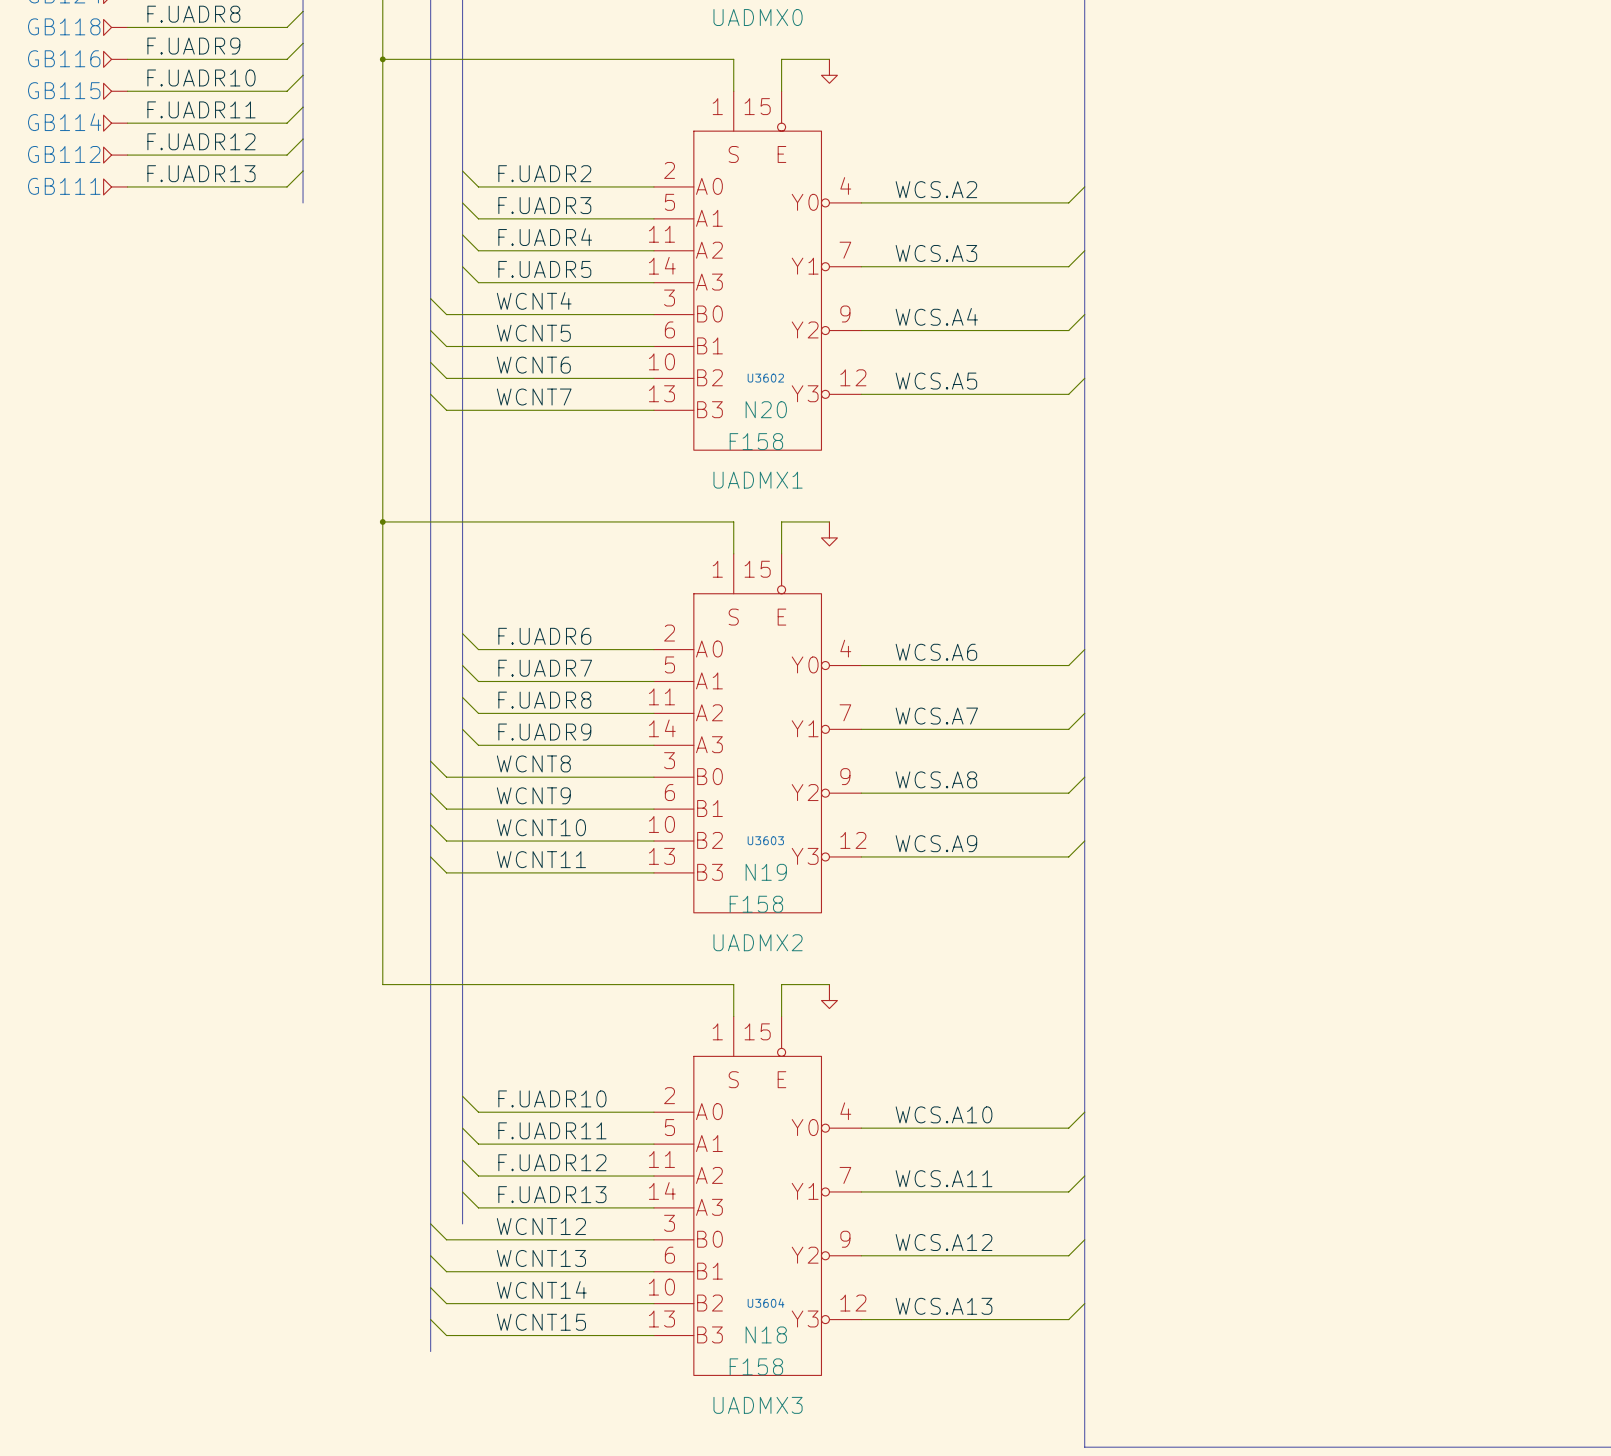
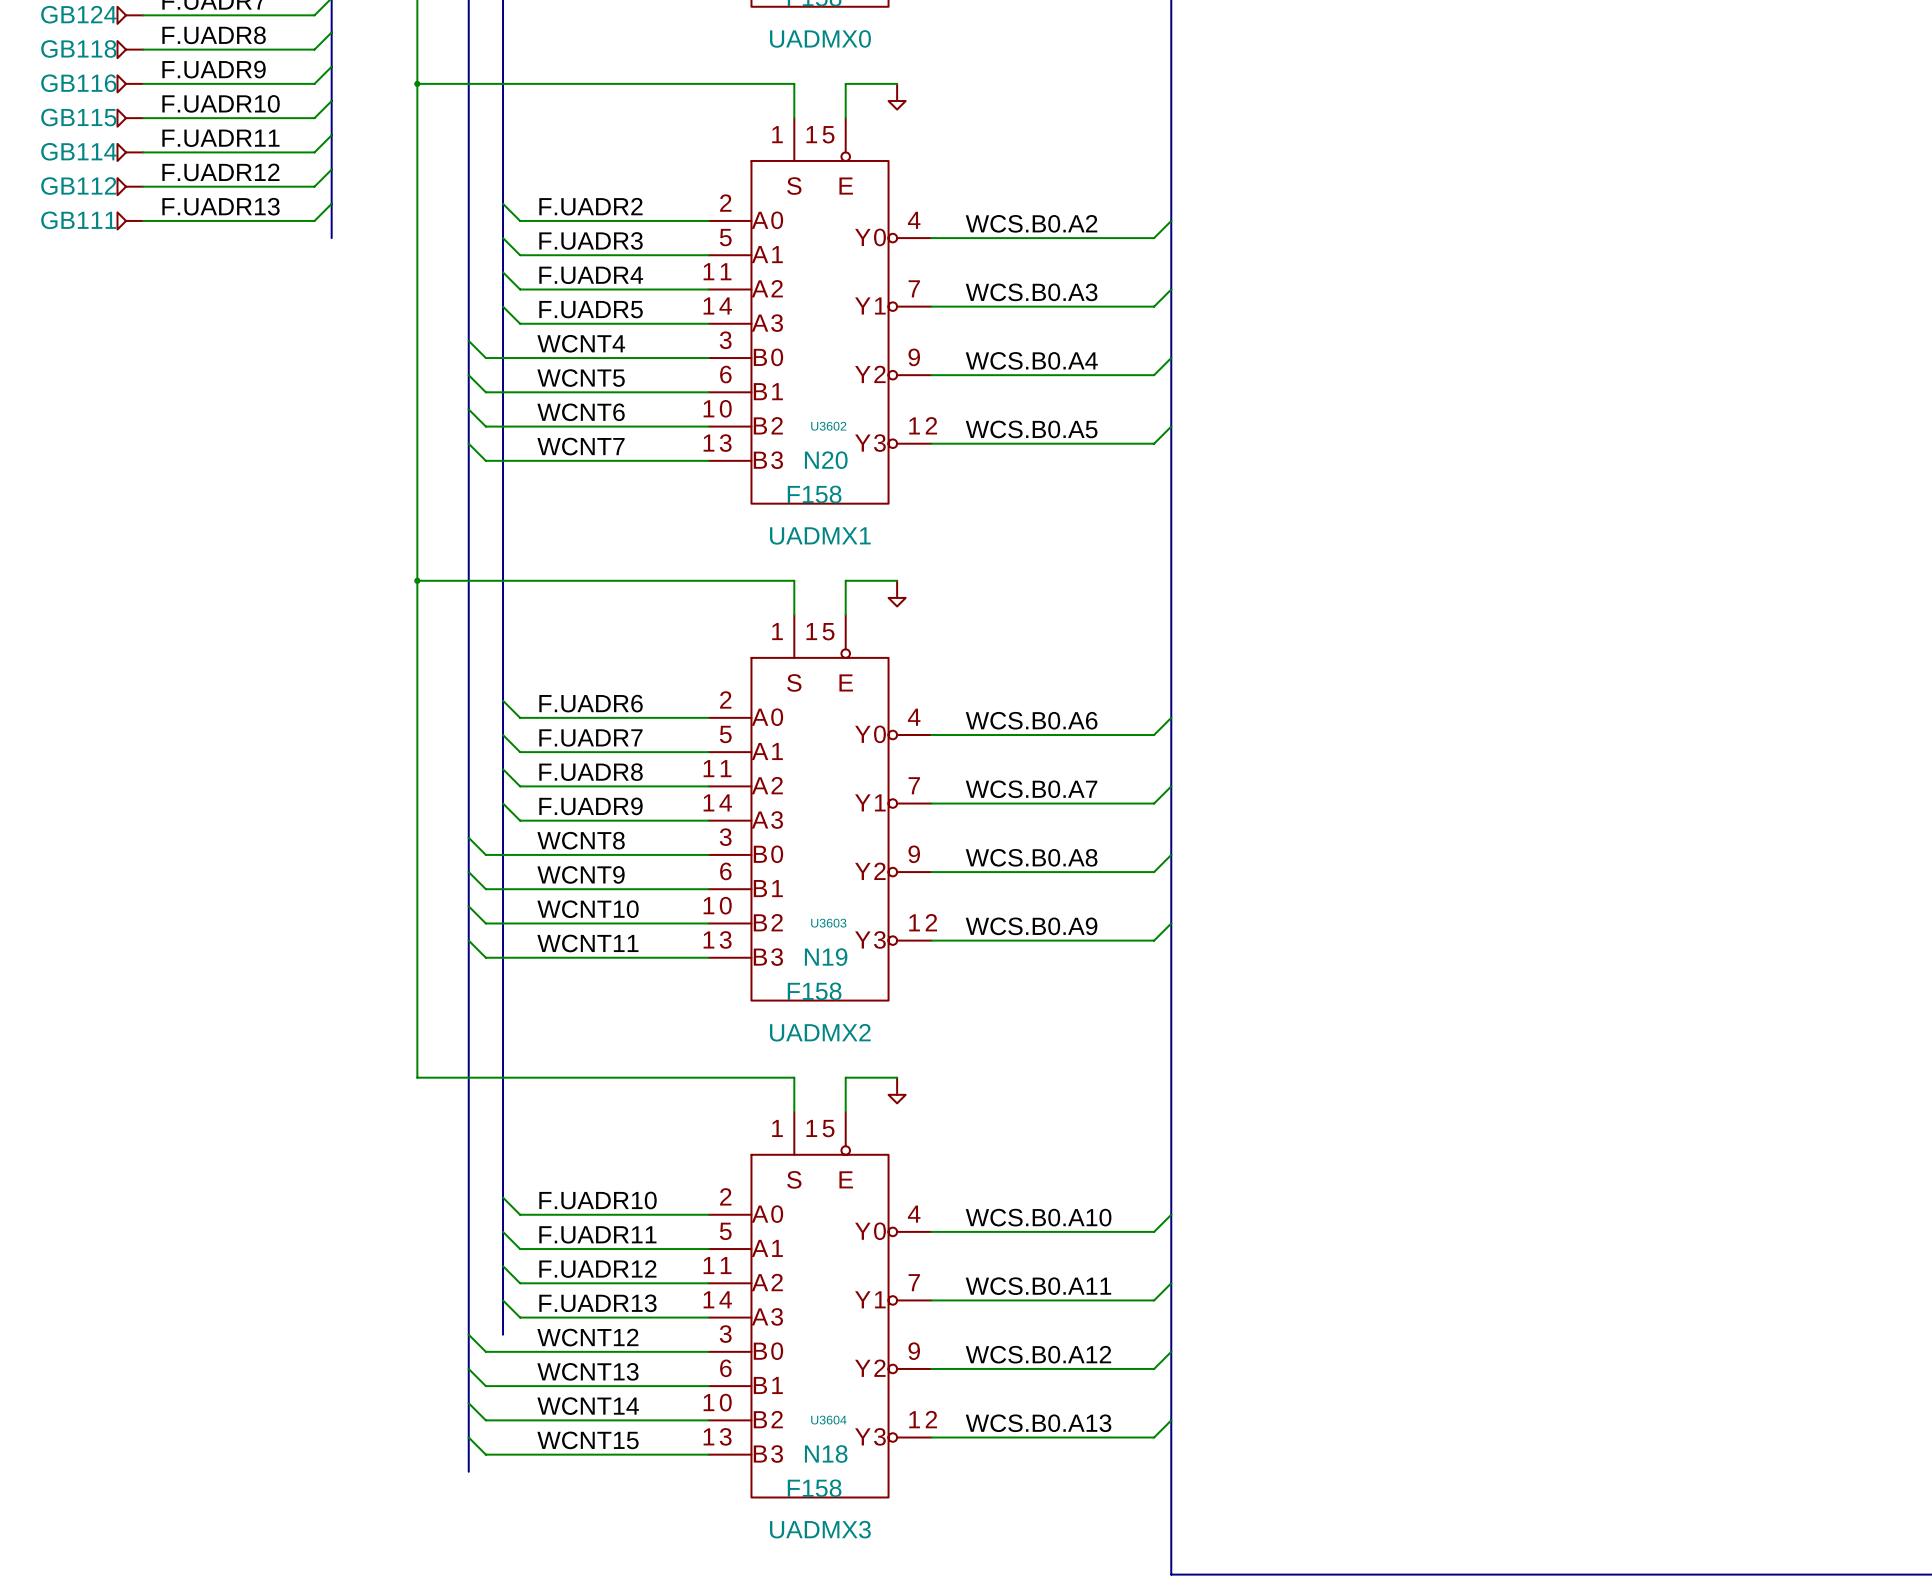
label: WCS.A2 (936, 189) -> WCS.B0.A2 (1031, 223)
label: WCS.A3 (936, 253) -> WCS.B0.A3 (1031, 292)
label: WCS.A4 (936, 316) -> WCS.B0.A4 (1031, 360)
label: WCS.A5 (936, 381) -> WCS.B0.A5 (1031, 429)
label: WCS.A6 (936, 652) -> WCS.B0.A6 (1031, 720)
label: WCS.A7 (936, 716) -> WCS.B0.A7 (1031, 789)
label: WCS.A8 (936, 779) -> WCS.B0.A8 (1031, 857)
label: WCS.A9 (936, 843) -> WCS.B0.A9 (1031, 926)
label: WCS.A10 (944, 1114) -> WCS.B0.A10 (1038, 1217)
label: WCS.A11 (944, 1178) -> WCS.B0.A11 (1038, 1286)
label: WCS.A12 (944, 1242) -> WCS.B0.A12 (1038, 1354)
label: WCS.A13 (944, 1306) -> WCS.B0.A13 (1038, 1423)

